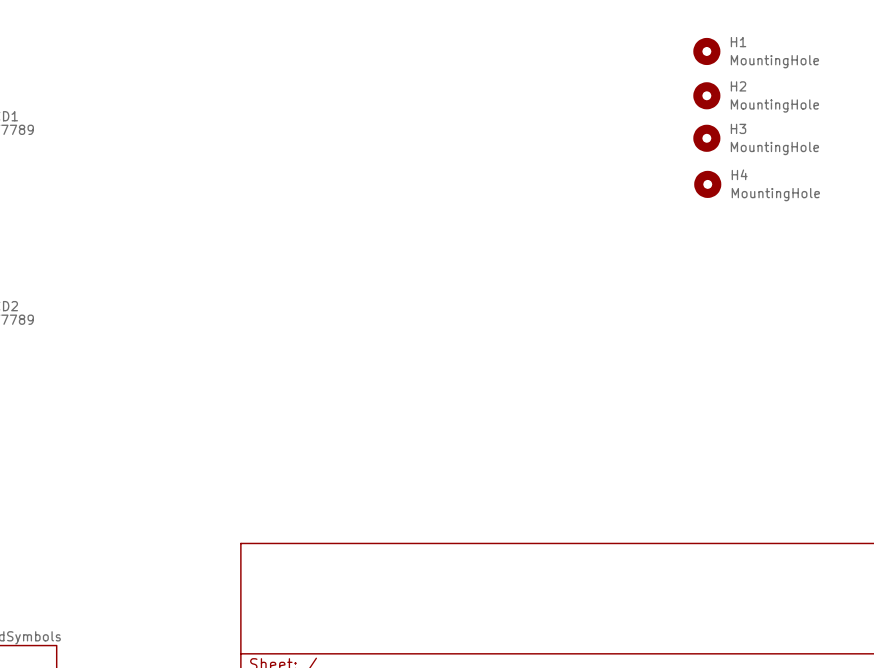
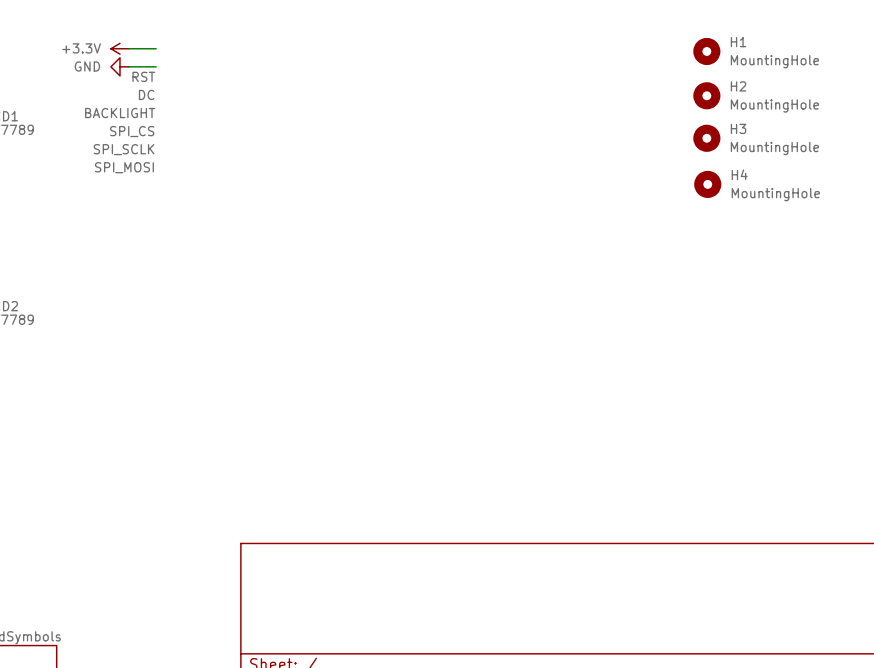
power symbol: none -> +3.3V (119, 48)
wire: none -> (129, 48) (156, 48)
power symbol: none -> GND (119, 66)
wire: none -> (129, 66) (156, 66)
label: none -> RST (143, 76)
label: none -> DC (146, 94)
label: none -> BACKLIGHT (120, 113)
label: none -> SPI_CS (132, 131)
label: none -> SPI_SCLK (124, 149)
label: none -> SPI_MOSI (124, 167)

